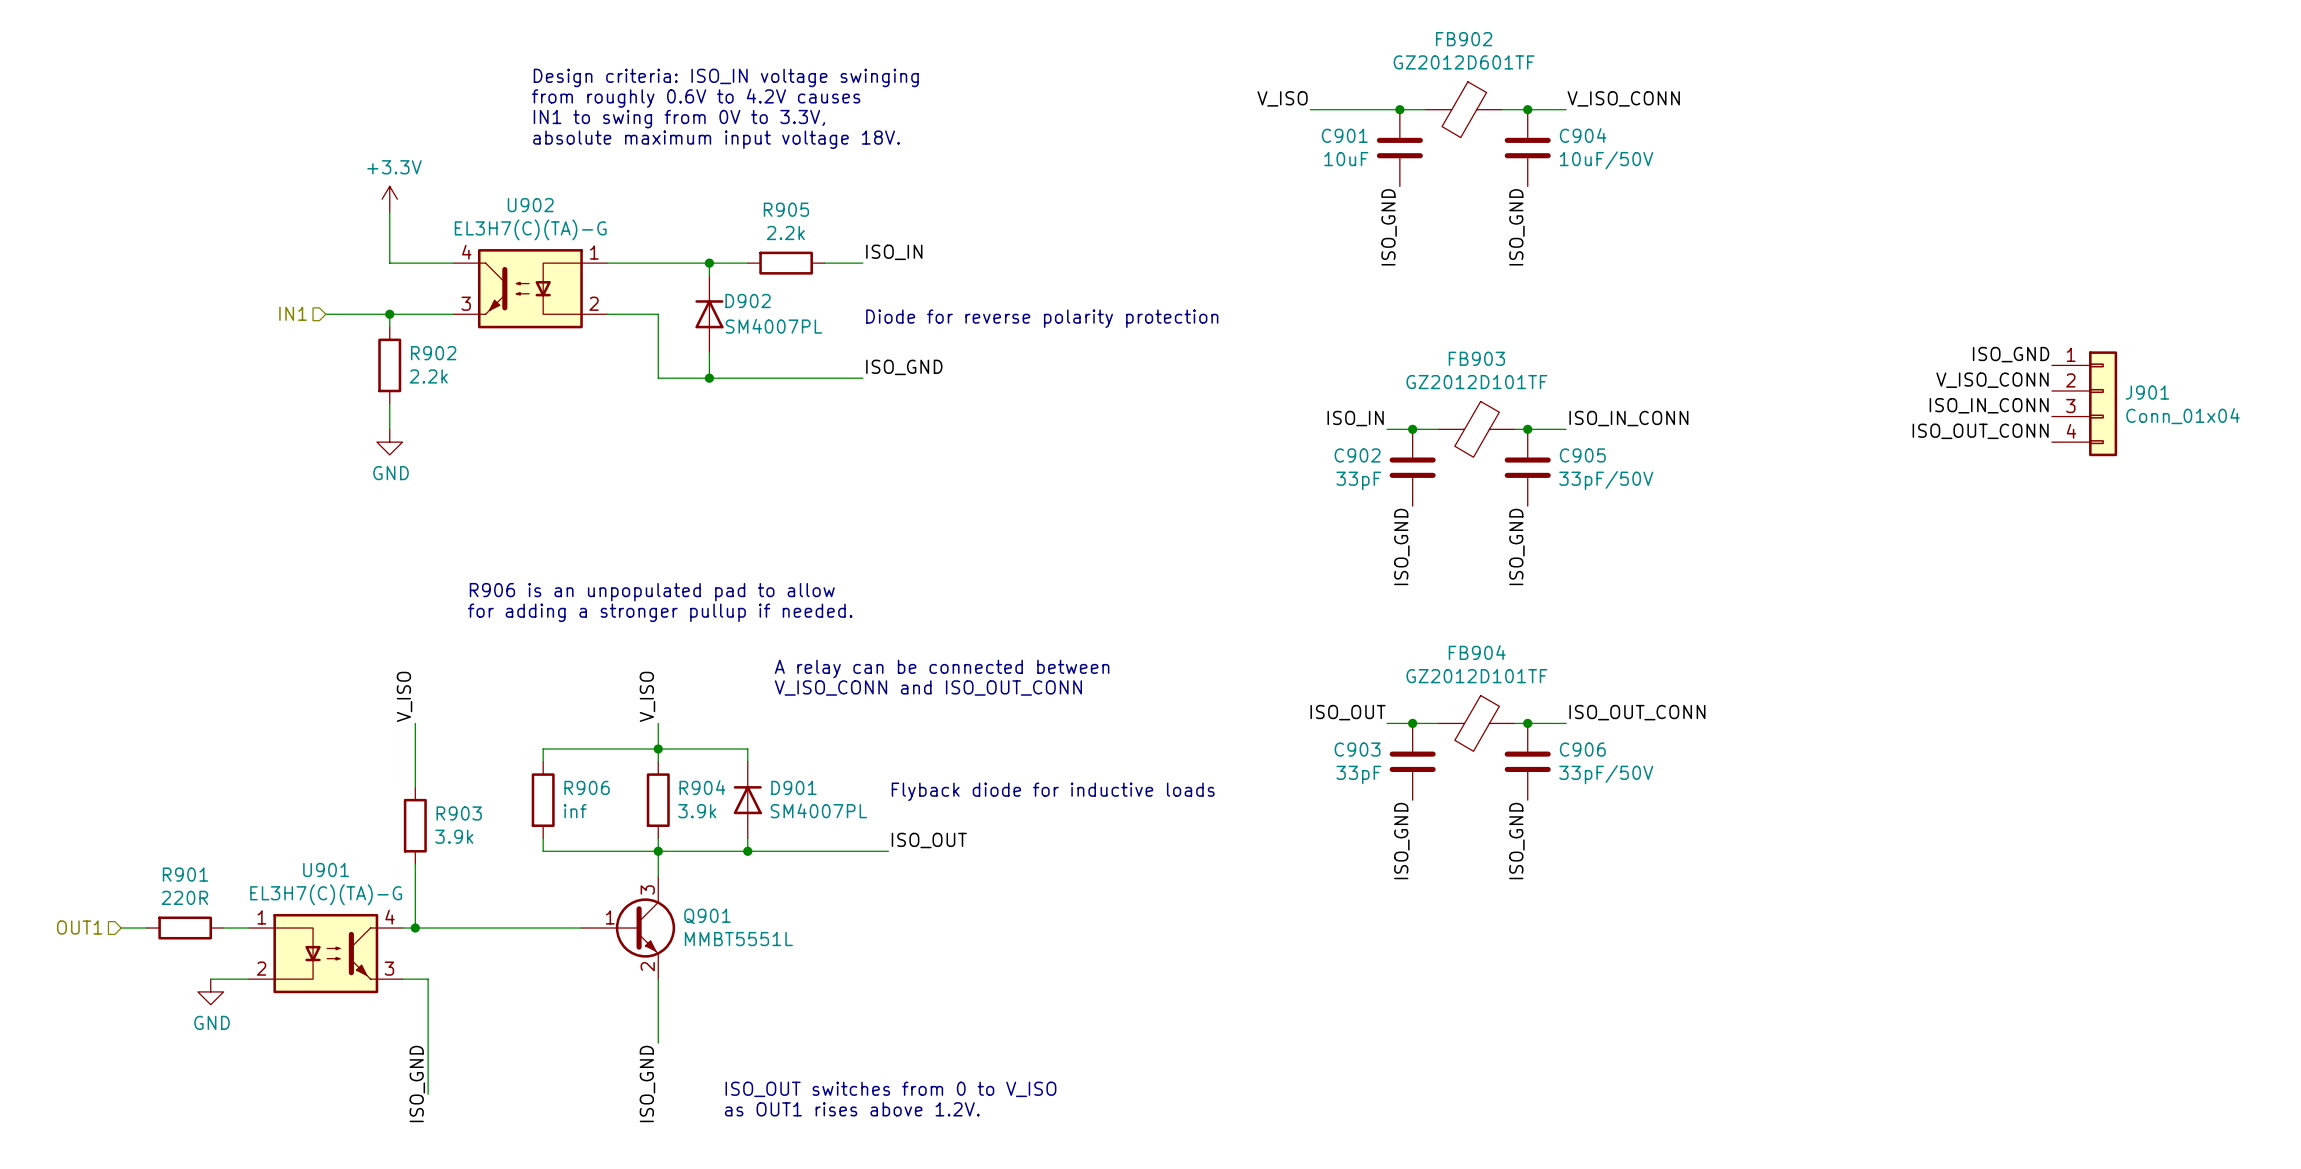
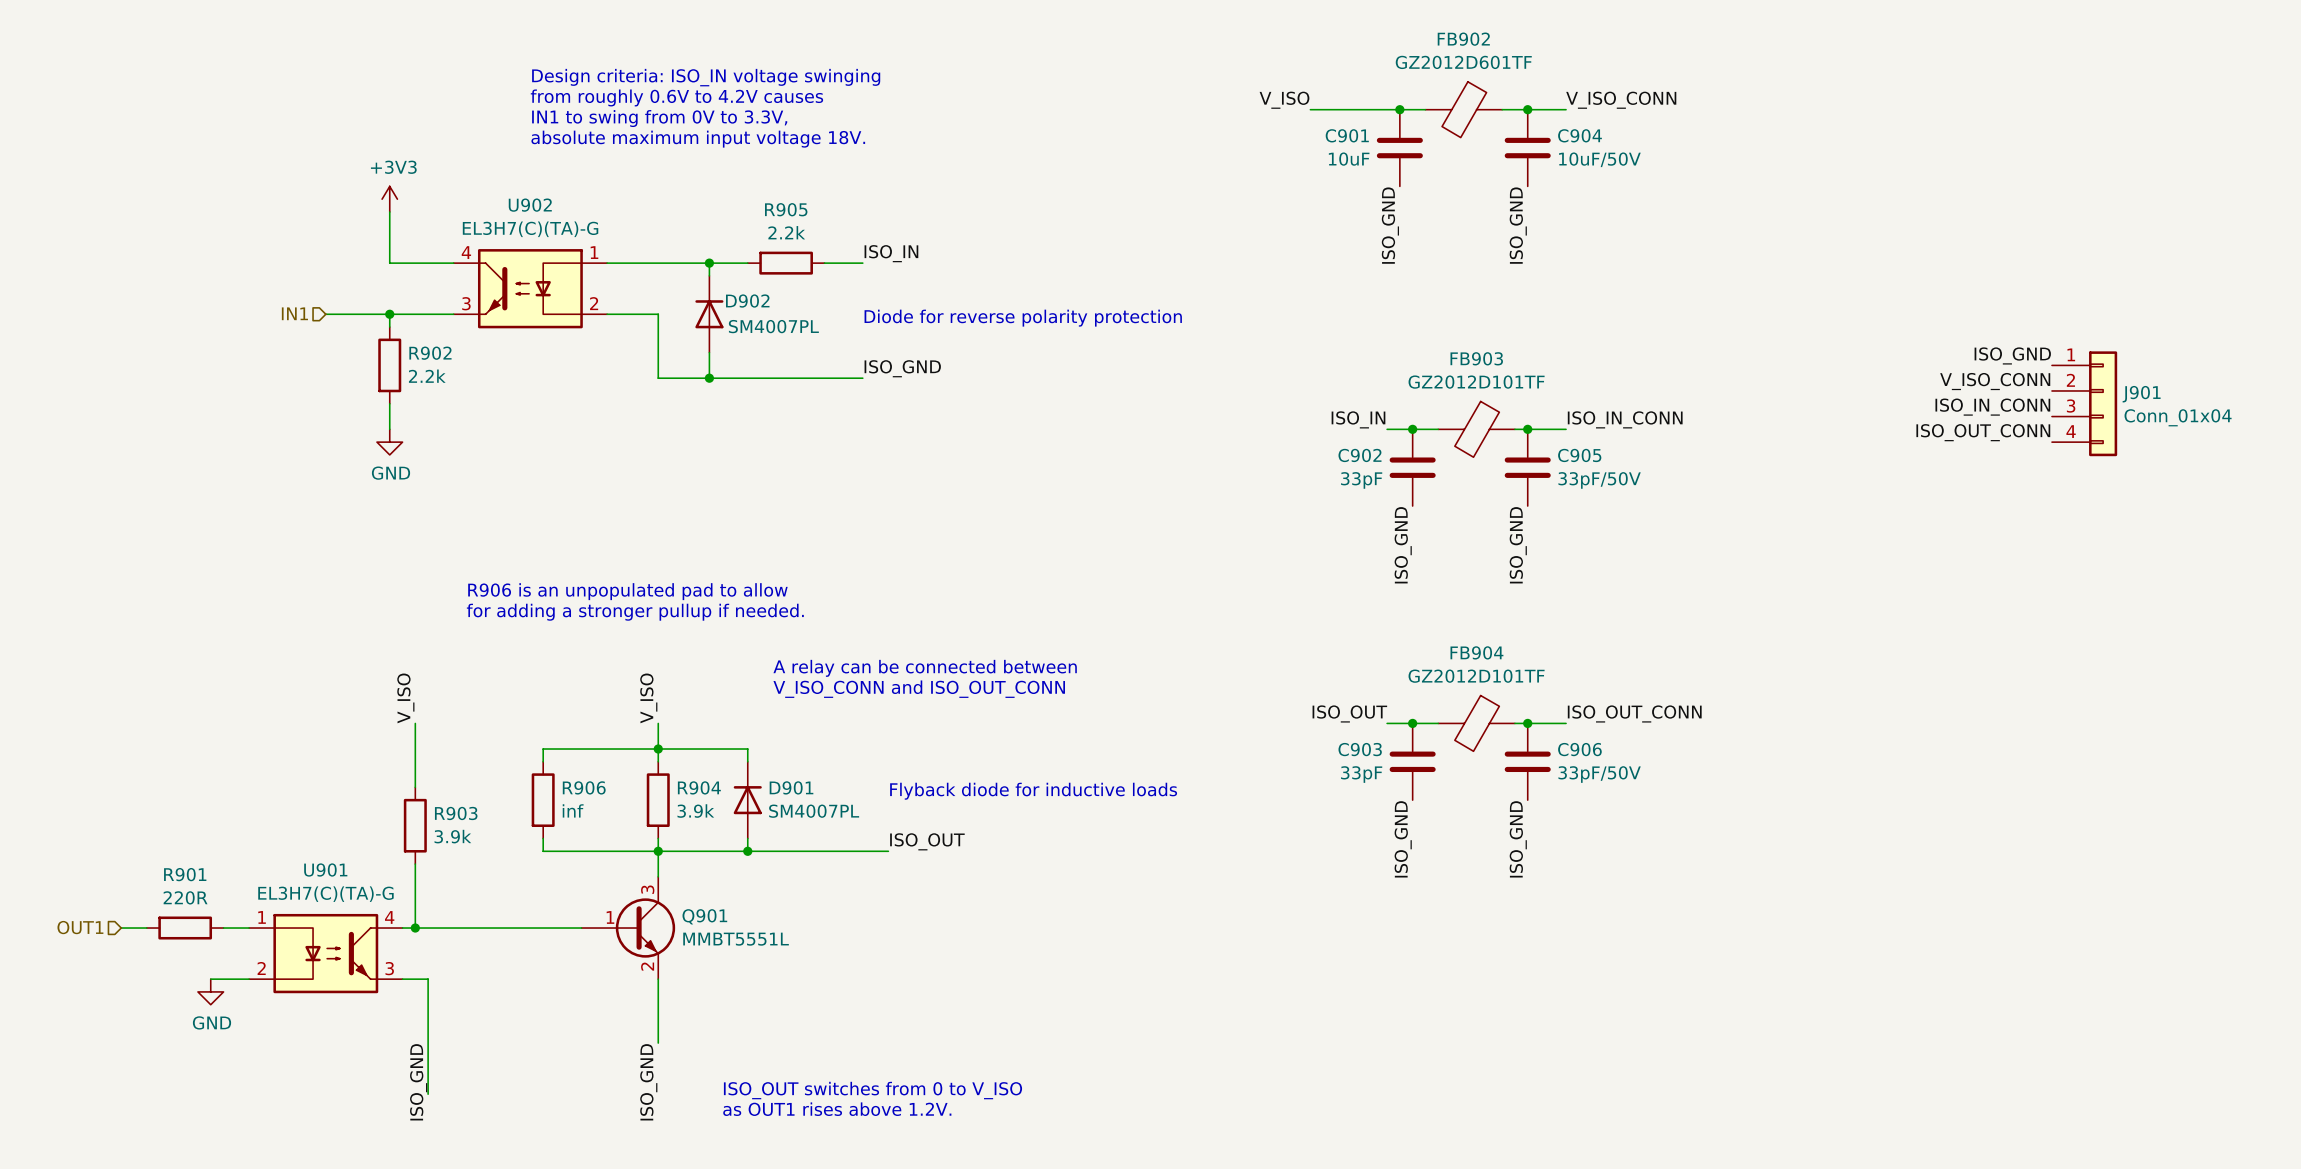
power symbol: +3.3V (389, 199) -> +3V3 (389, 199)

